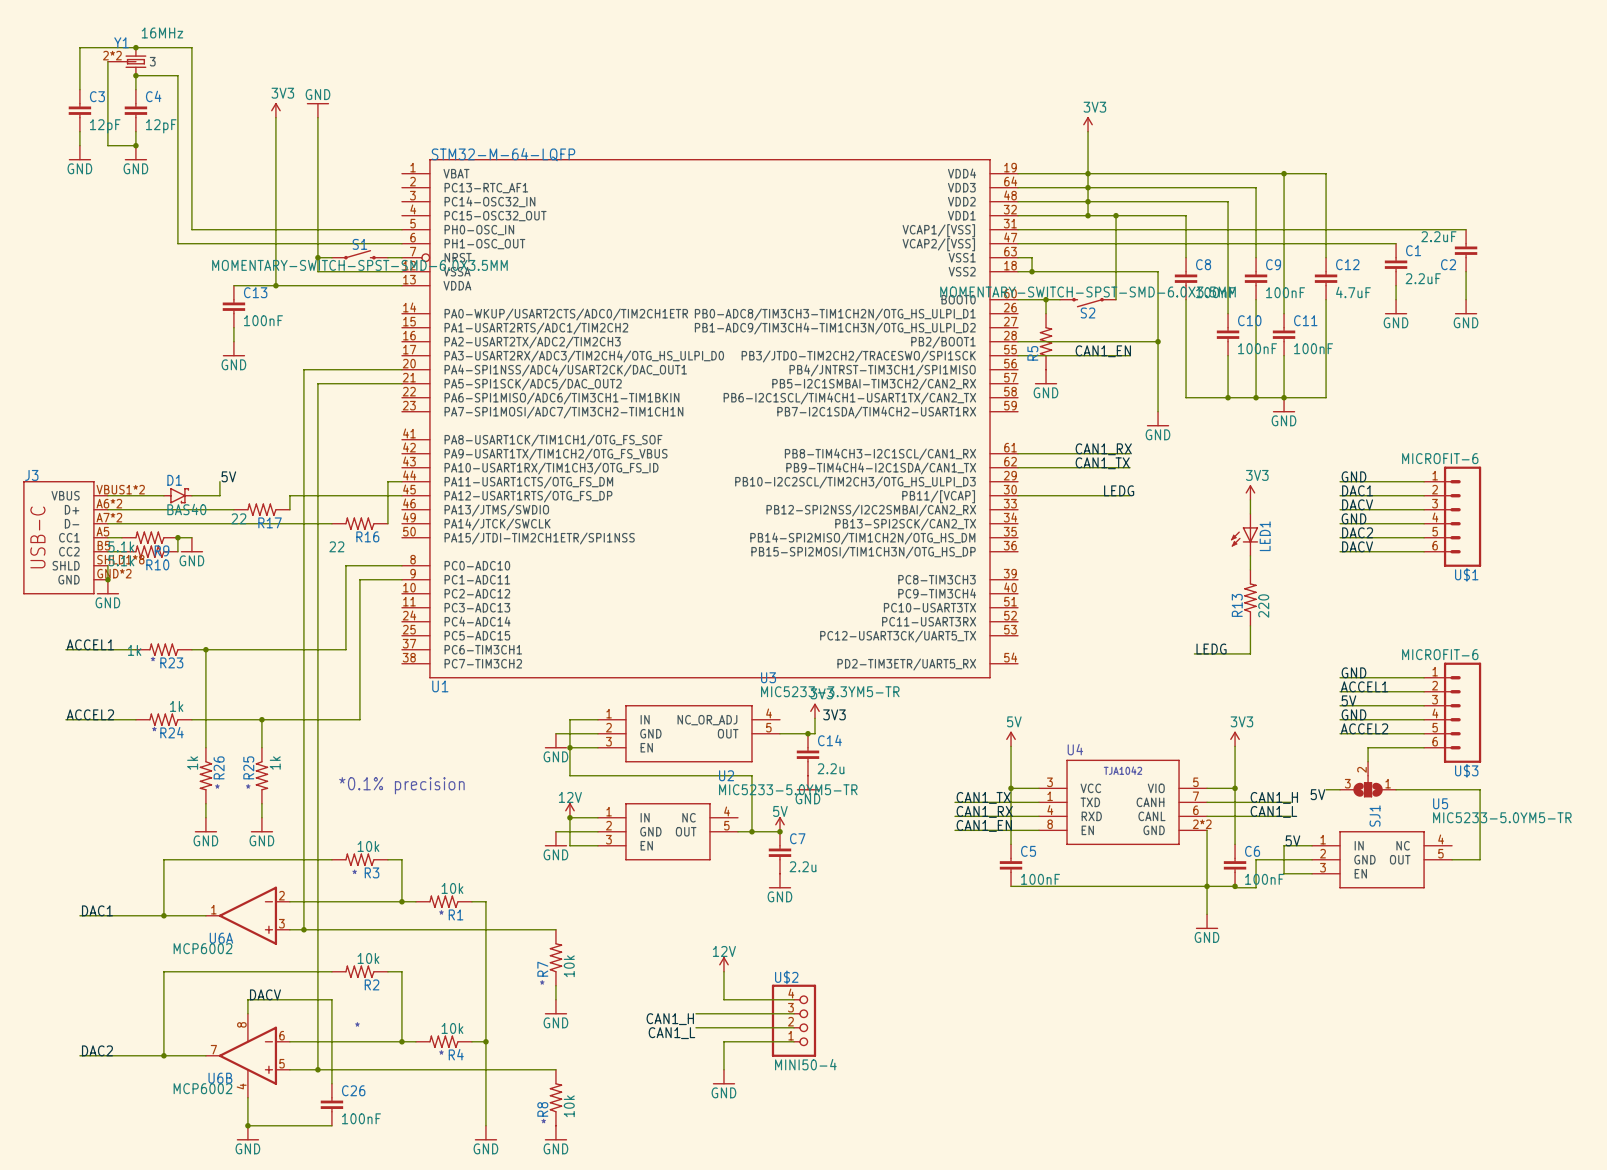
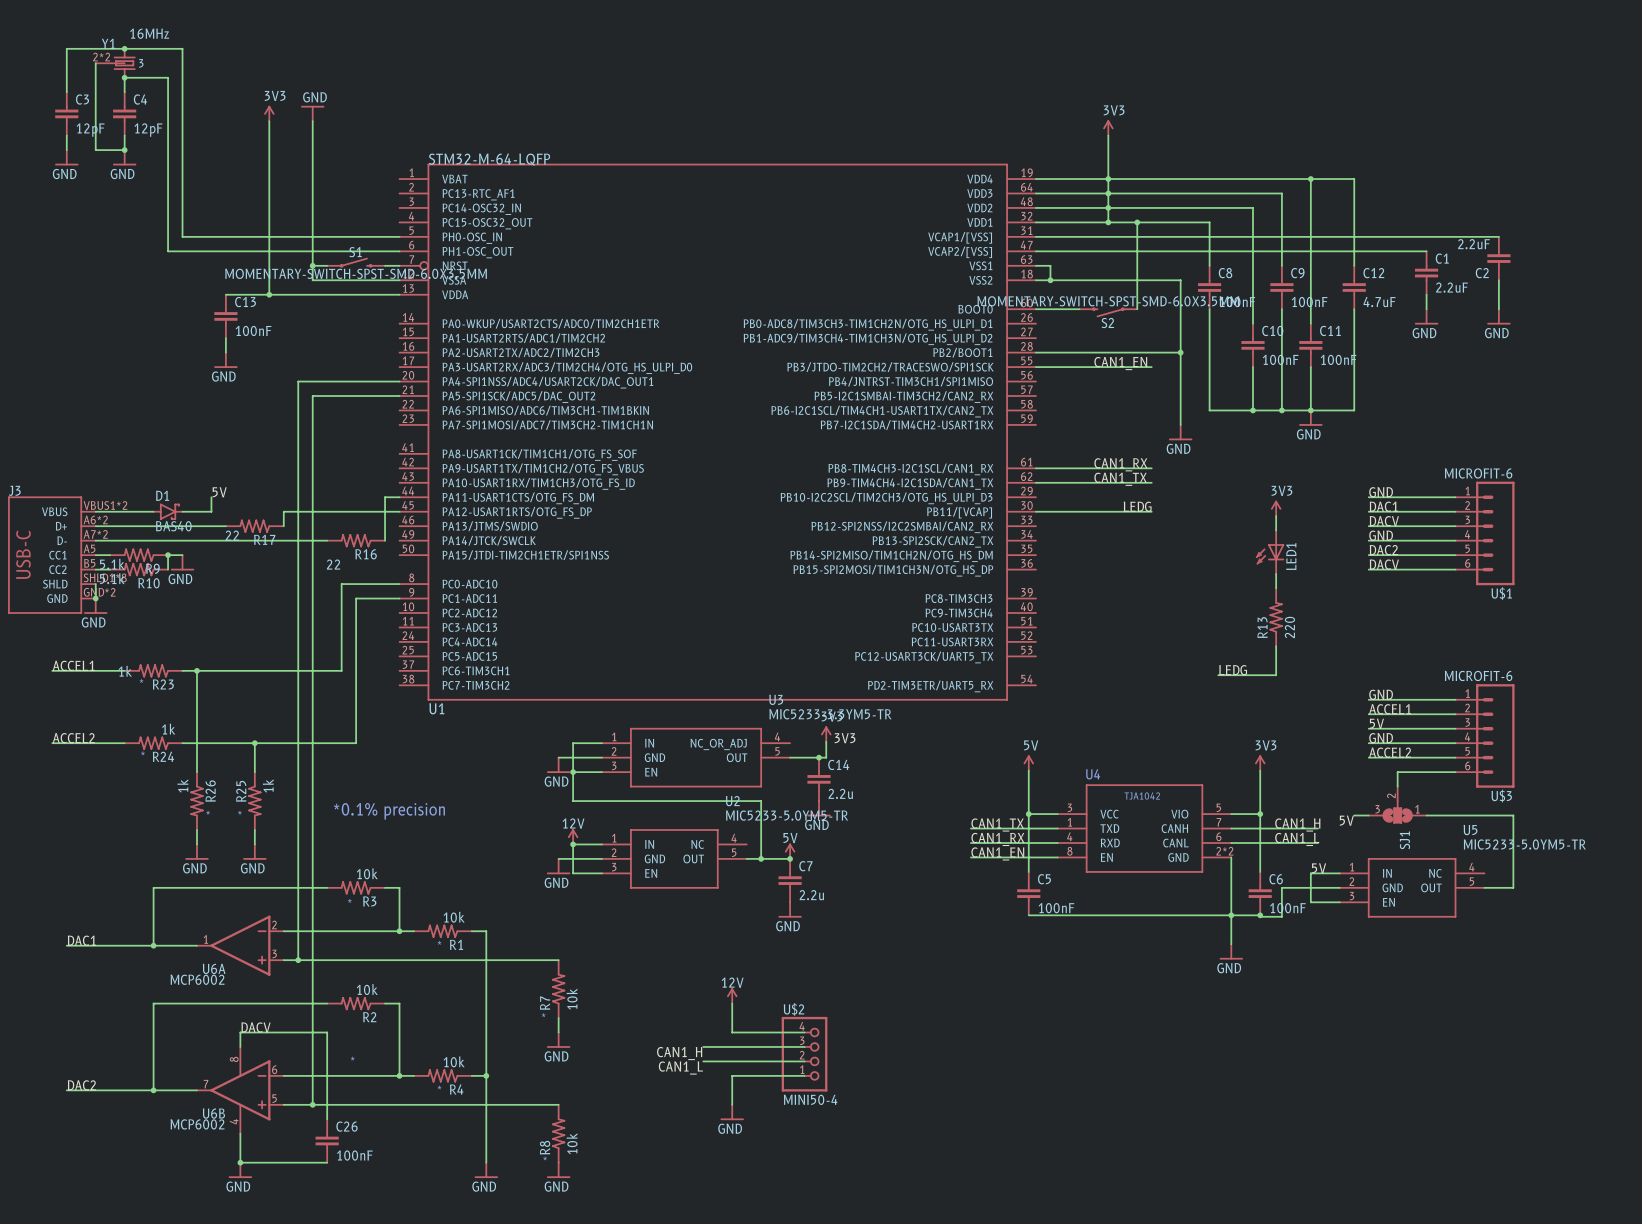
wire: (1046, 299) (1046, 313) -> none
junction: (1046, 299) -> none
R5: (1046, 341) -> none
power symbol: GND (1046, 377) -> none

